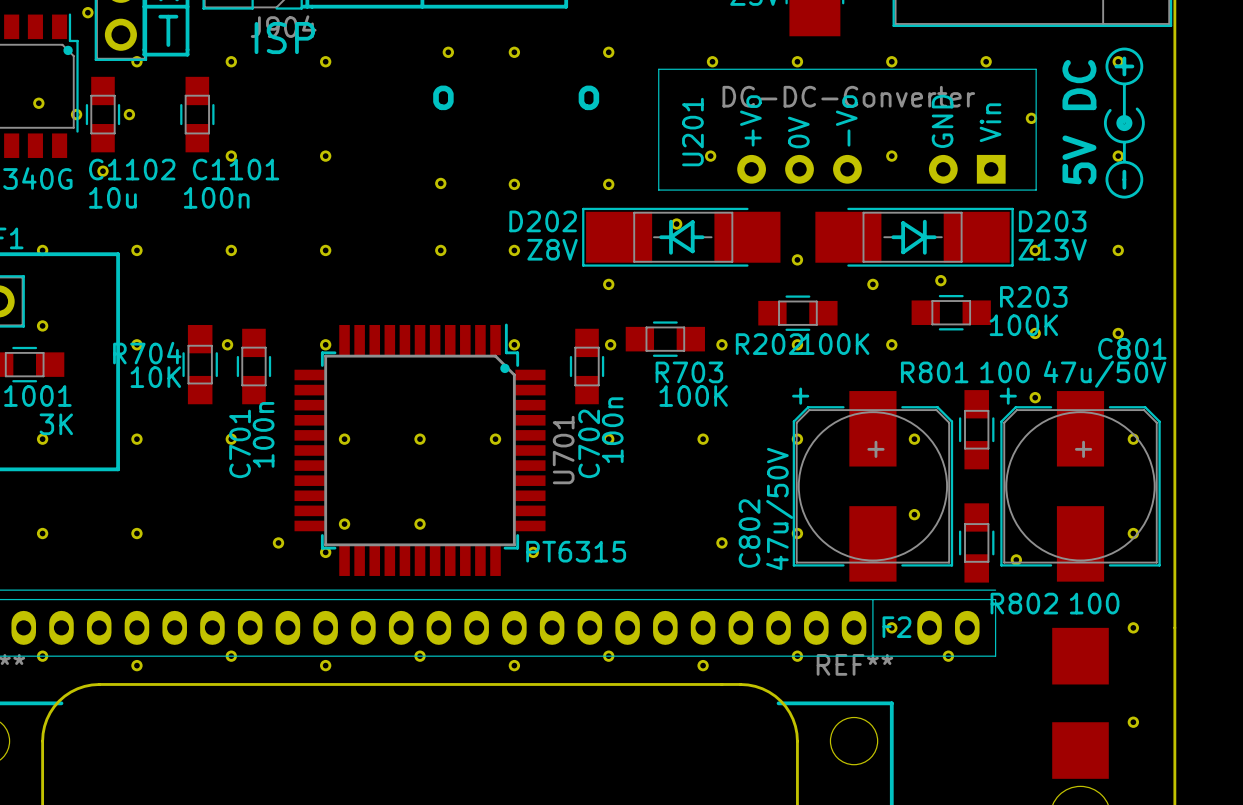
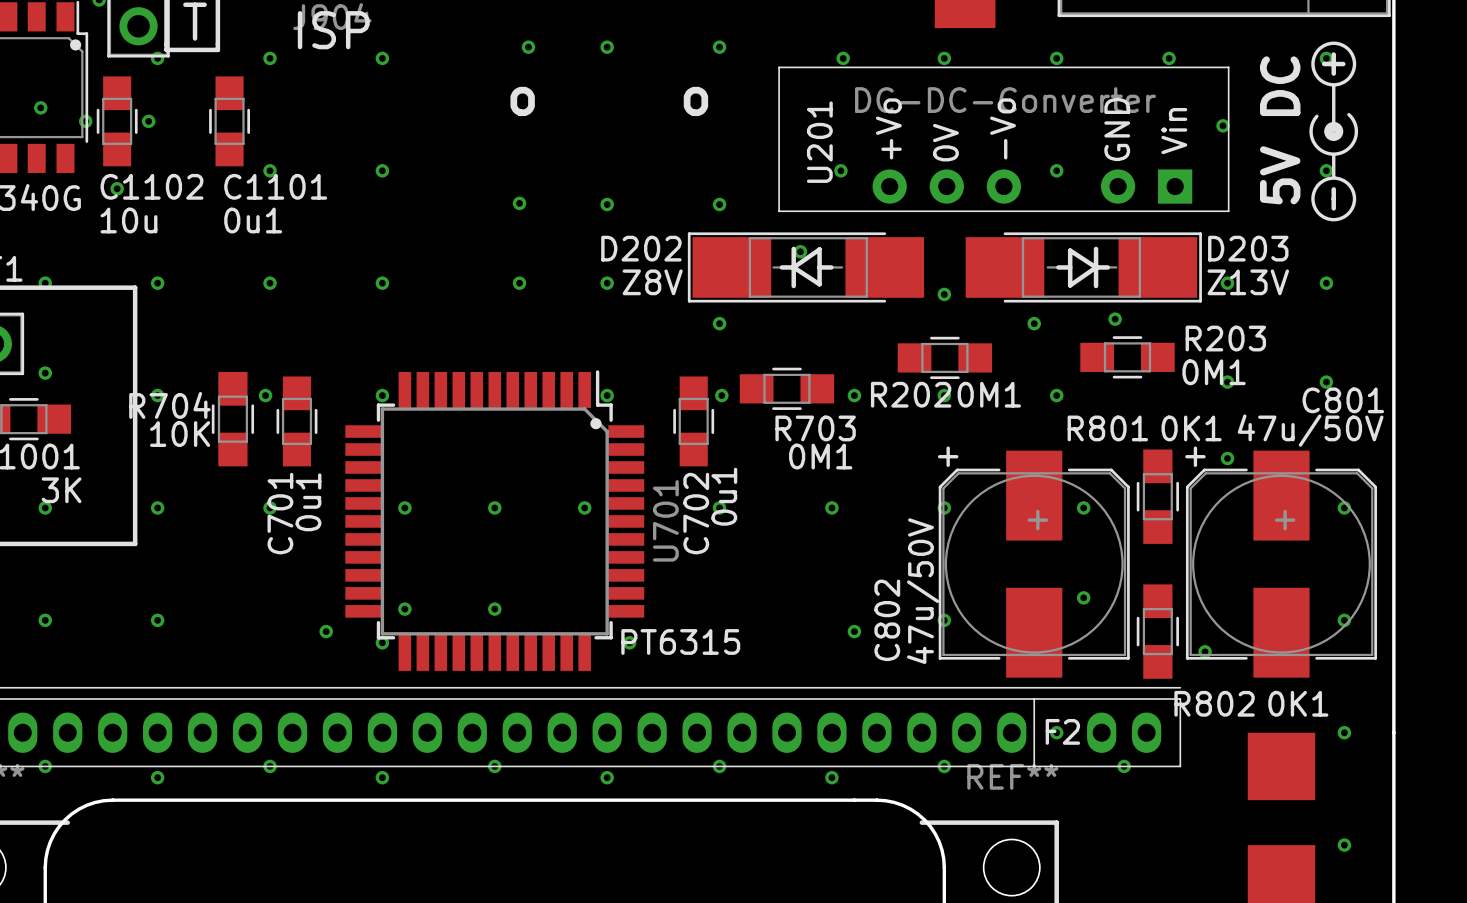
C1101 value: 100n (216, 197) -> 0u1 (253, 220)
R203 value: 100K (1023, 325) -> 0M1 (1214, 372)
R202 value: 100K (835, 344) -> 0M1 (989, 394)
R801 value: 100 (1005, 372) -> 0K1 (1191, 428)
R703 value: 100K (693, 395) -> 0M1 (820, 456)
C702 value: 100n (612, 430) -> 0u1 (724, 496)
C701 value: 100n (263, 434) -> 0u1 (308, 502)
R802 value: 100 (1094, 603) -> 0K1 (1298, 703)

